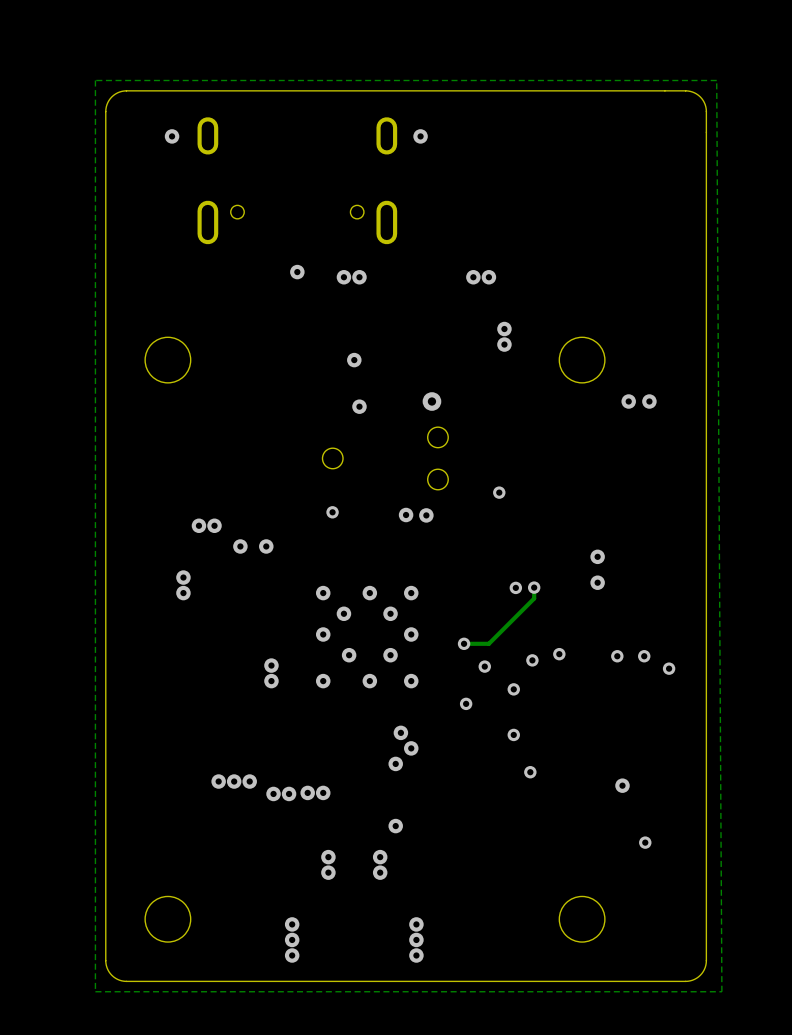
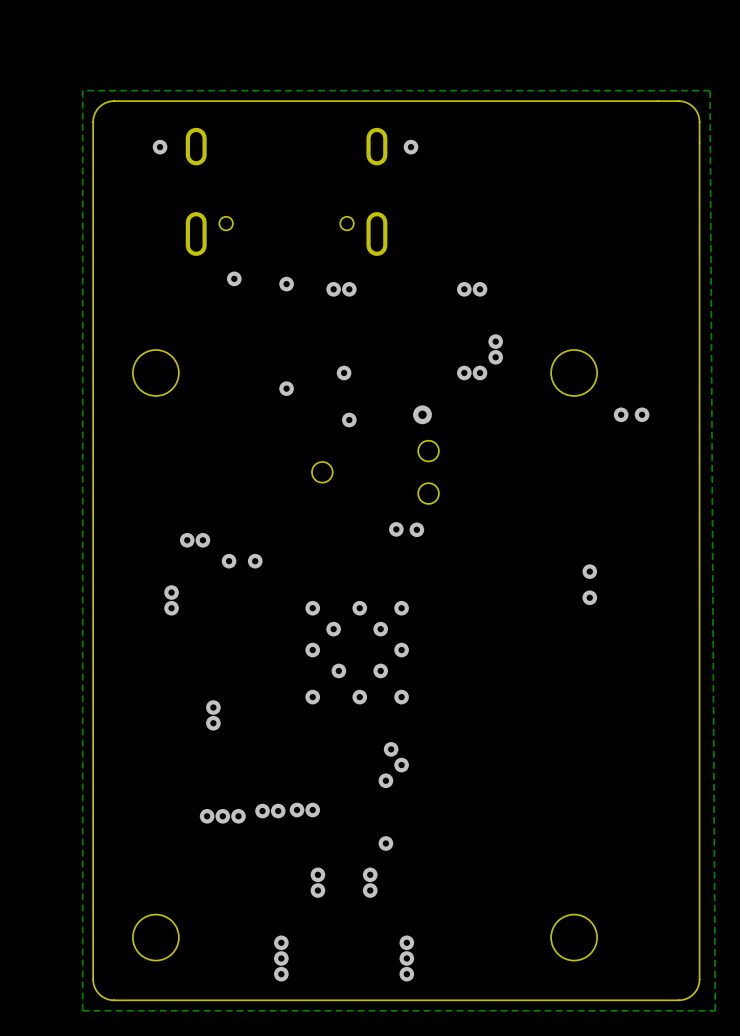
via: none -> (234, 278)
via: none -> (464, 372)
via: none -> (480, 372)
via: none -> (286, 388)
via: (499, 492) -> none
via: (332, 512) -> none
via: (515, 587) -> none
track: (534, 587) (534, 598) (488, 643) (464, 643) -> none
via: (534, 587) -> none
via: (464, 643) -> none
via: (559, 654) -> none
via: (617, 656) -> none
via: (644, 656) -> none
via: (532, 660) -> none
via: (271, 665) -> none
via: (484, 666) -> none
via: (669, 668) -> none
via: (271, 681) -> none
via: (513, 689) -> none
via: none -> (213, 707)
via: (466, 703) -> none
via: none -> (213, 723)
via: (513, 734) -> none
via: (530, 772) -> none
via: (218, 781) -> none
via: (234, 781) -> none
via: (249, 781) -> none
via: (622, 785) -> none
via: none -> (207, 816)
via: none -> (222, 816)
via: none -> (238, 816)
via: (645, 842) -> none

